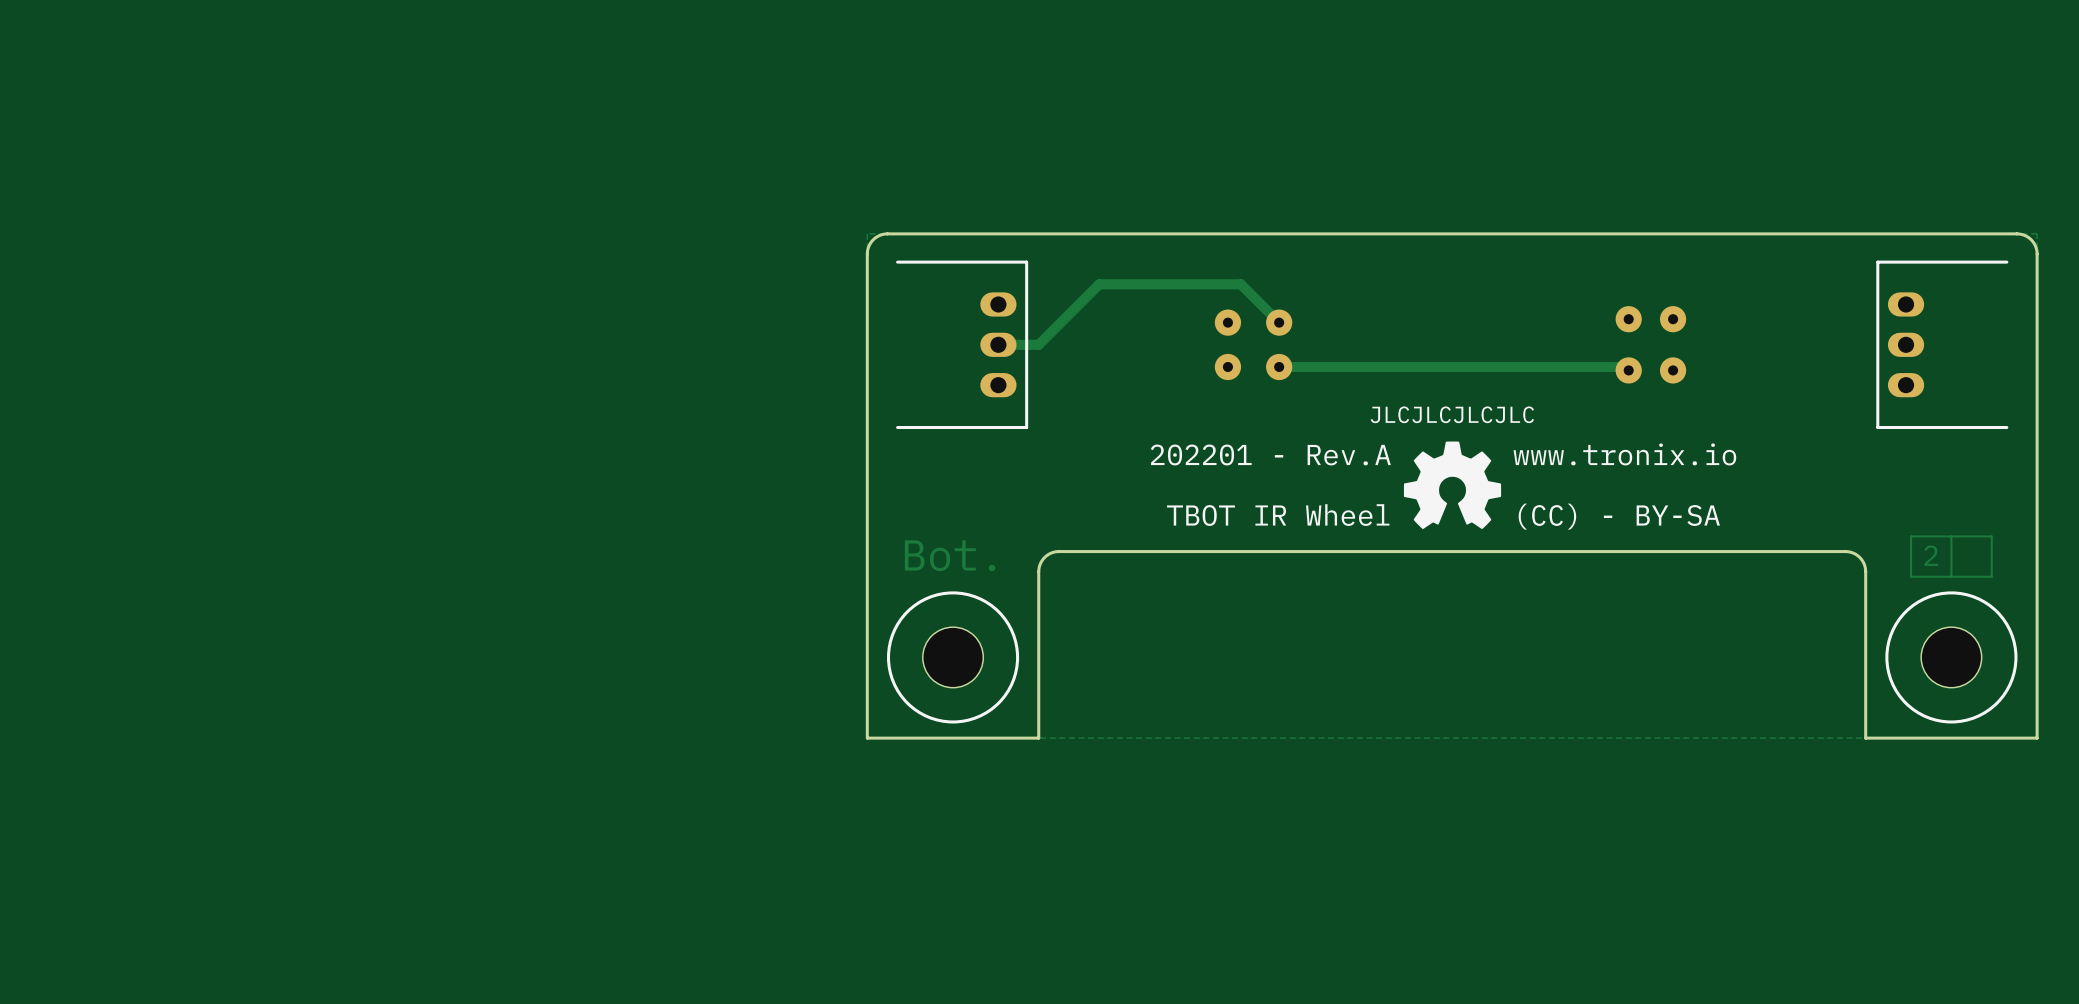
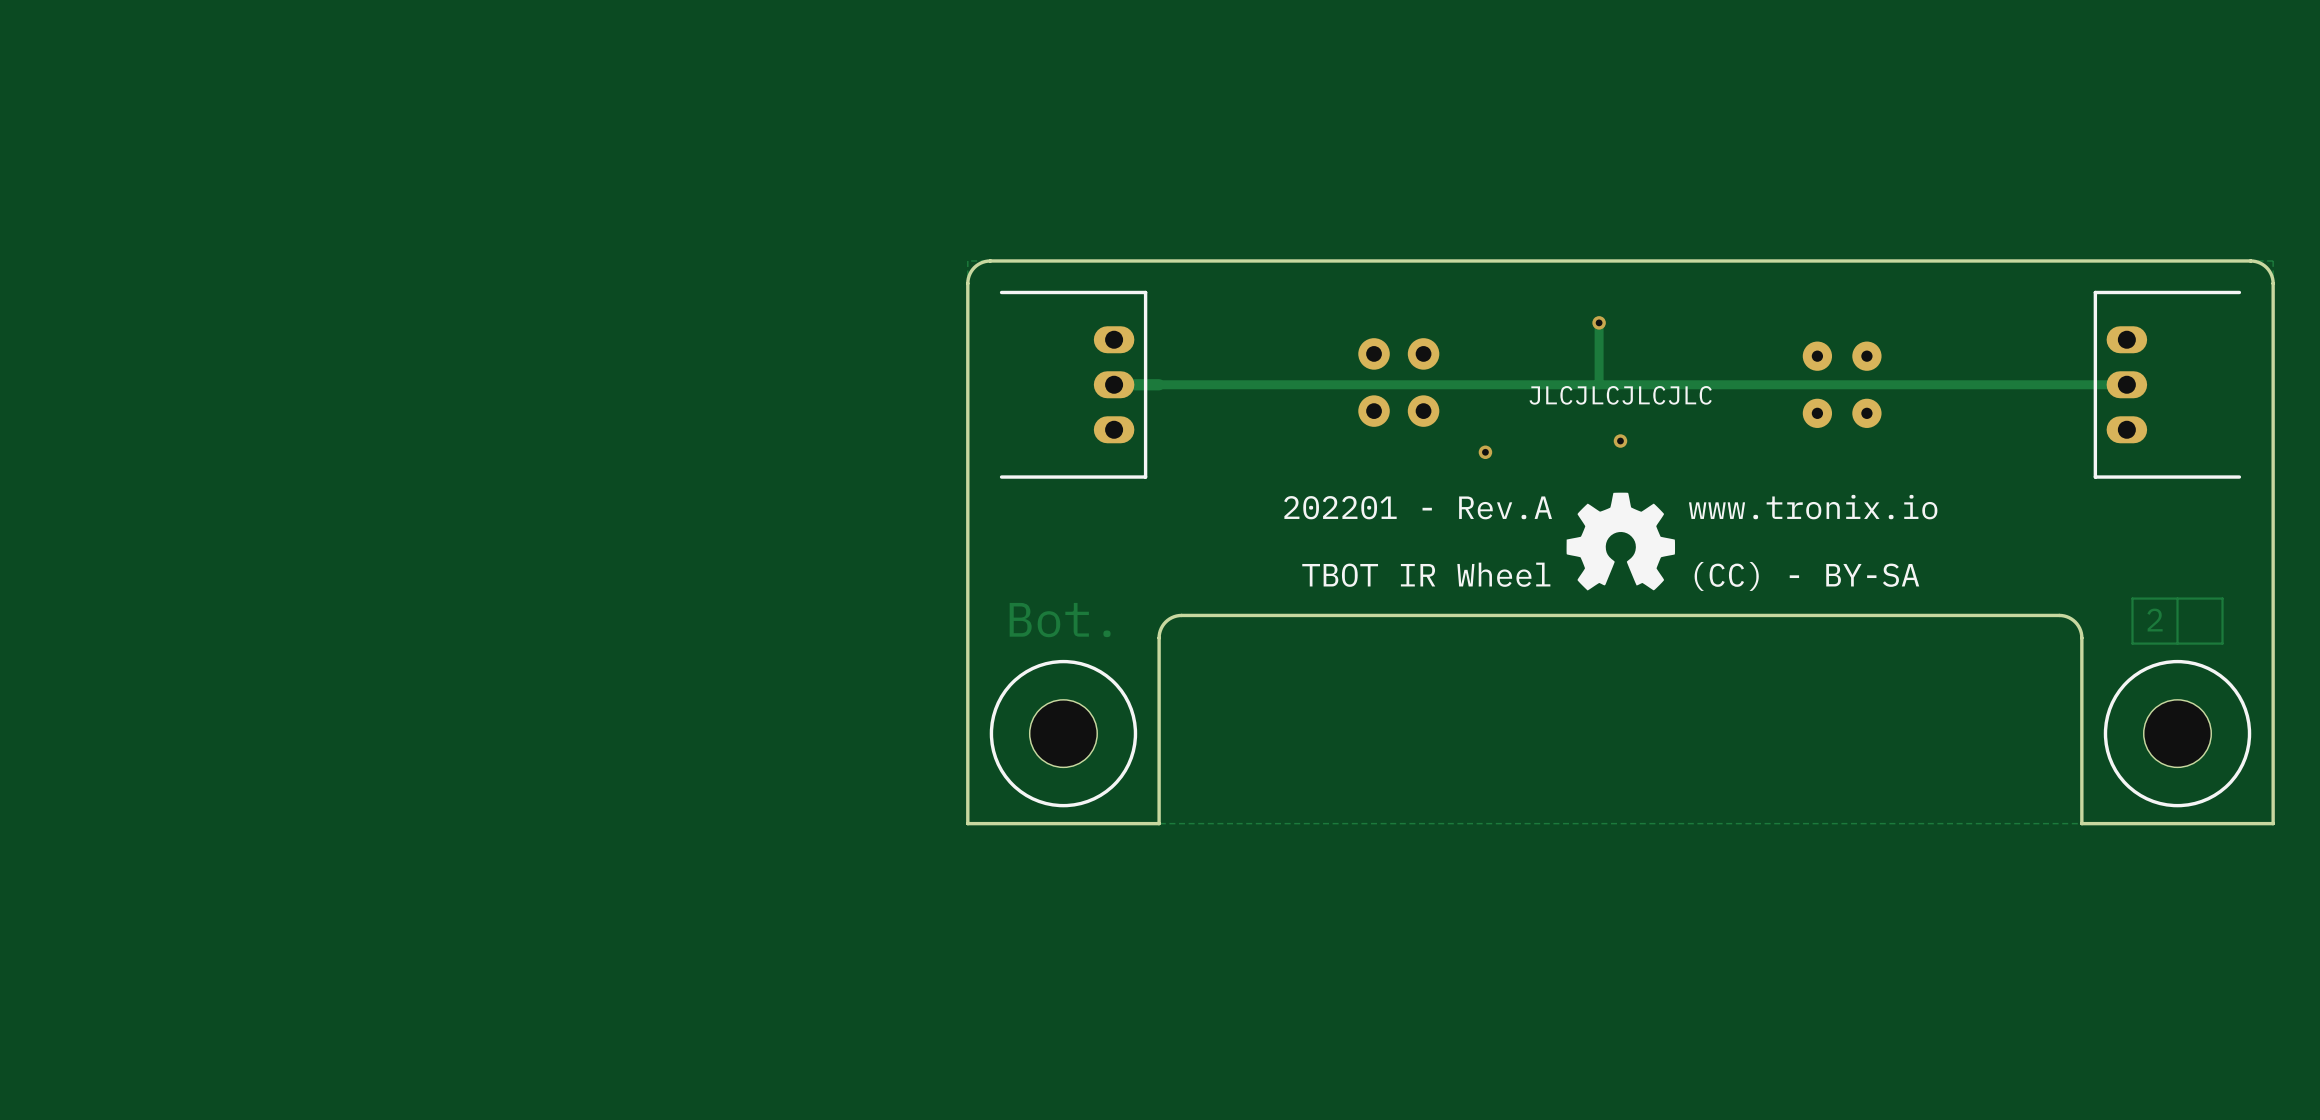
track: none -> (1599, 322) (1599, 384)
via: none -> (1599, 322)
part footprint: [1214, 309, 1293, 381] -> [1358, 338, 1440, 427]
track: (1279, 322) (1240, 284) (1099, 284) (1038, 344) -> (2126, 384) (1159, 384)
track: (1625, 367) (1279, 367) -> none
via: none -> (1620, 441)
via: none -> (1485, 452)
text position: JLCJLCJLCJLC (1452, 414) -> JLCJLCJLCJLC (1620, 395)

